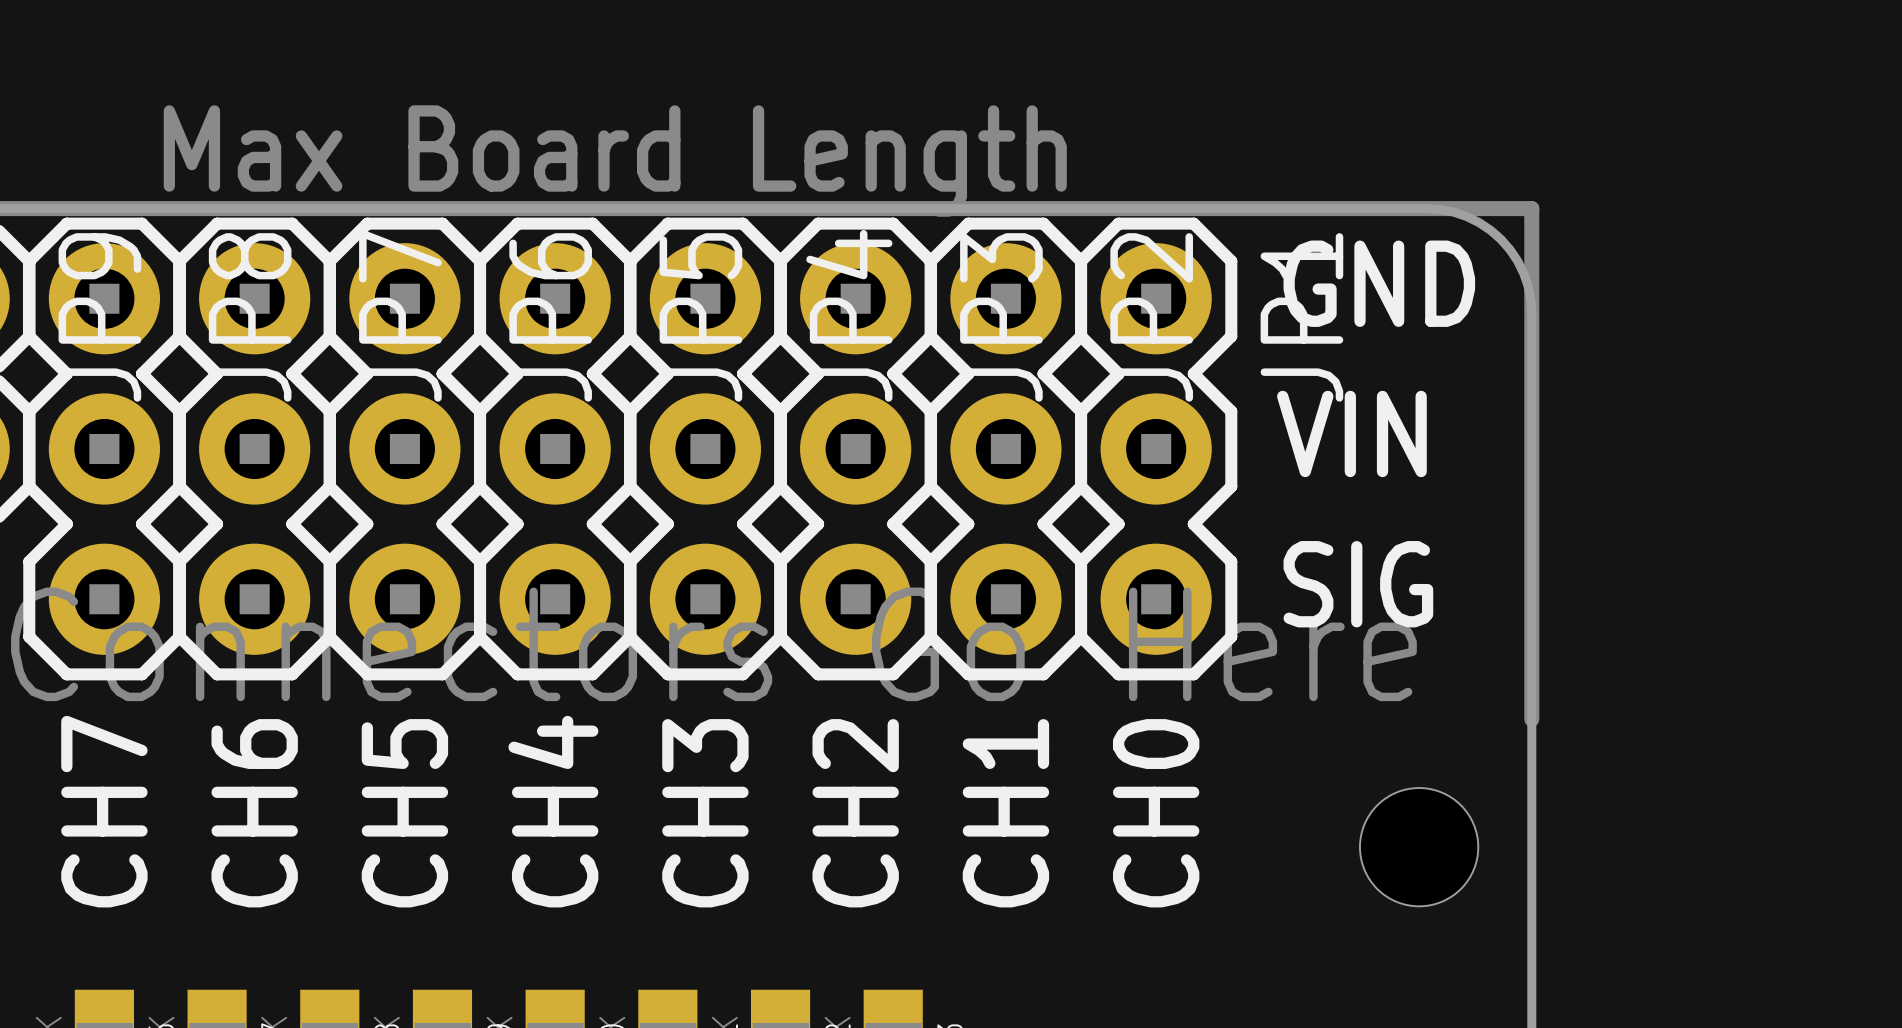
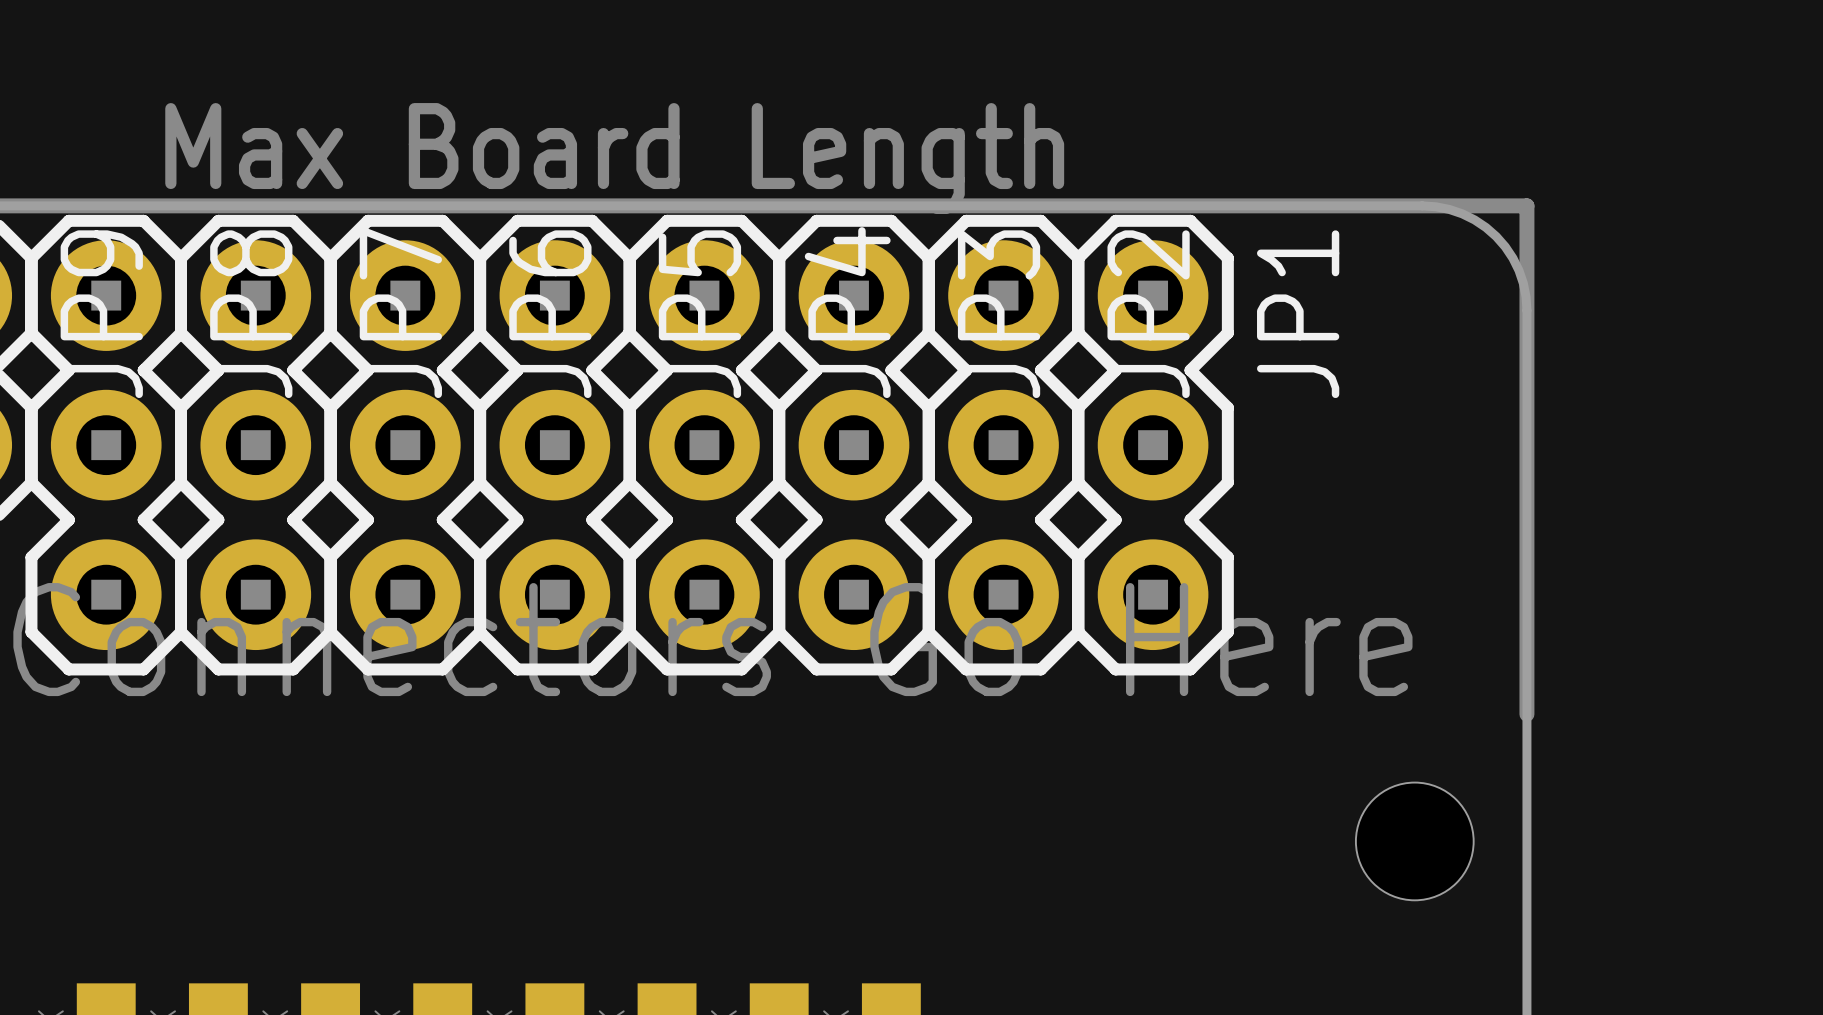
text: GND (1379, 283) -> none
text: VIN (1351, 433) -> none
text: SIG (1358, 584) -> none
text: CH7 (104, 811) -> none
text: CH4 (553, 811) -> none
text: CH6 (254, 813) -> none
text: CH5 (404, 813) -> none
text: CH3 (705, 813) -> none
text: CH2 (855, 813) -> none
text: CH1 (1005, 813) -> none
text: CH0 (1156, 813) -> none

